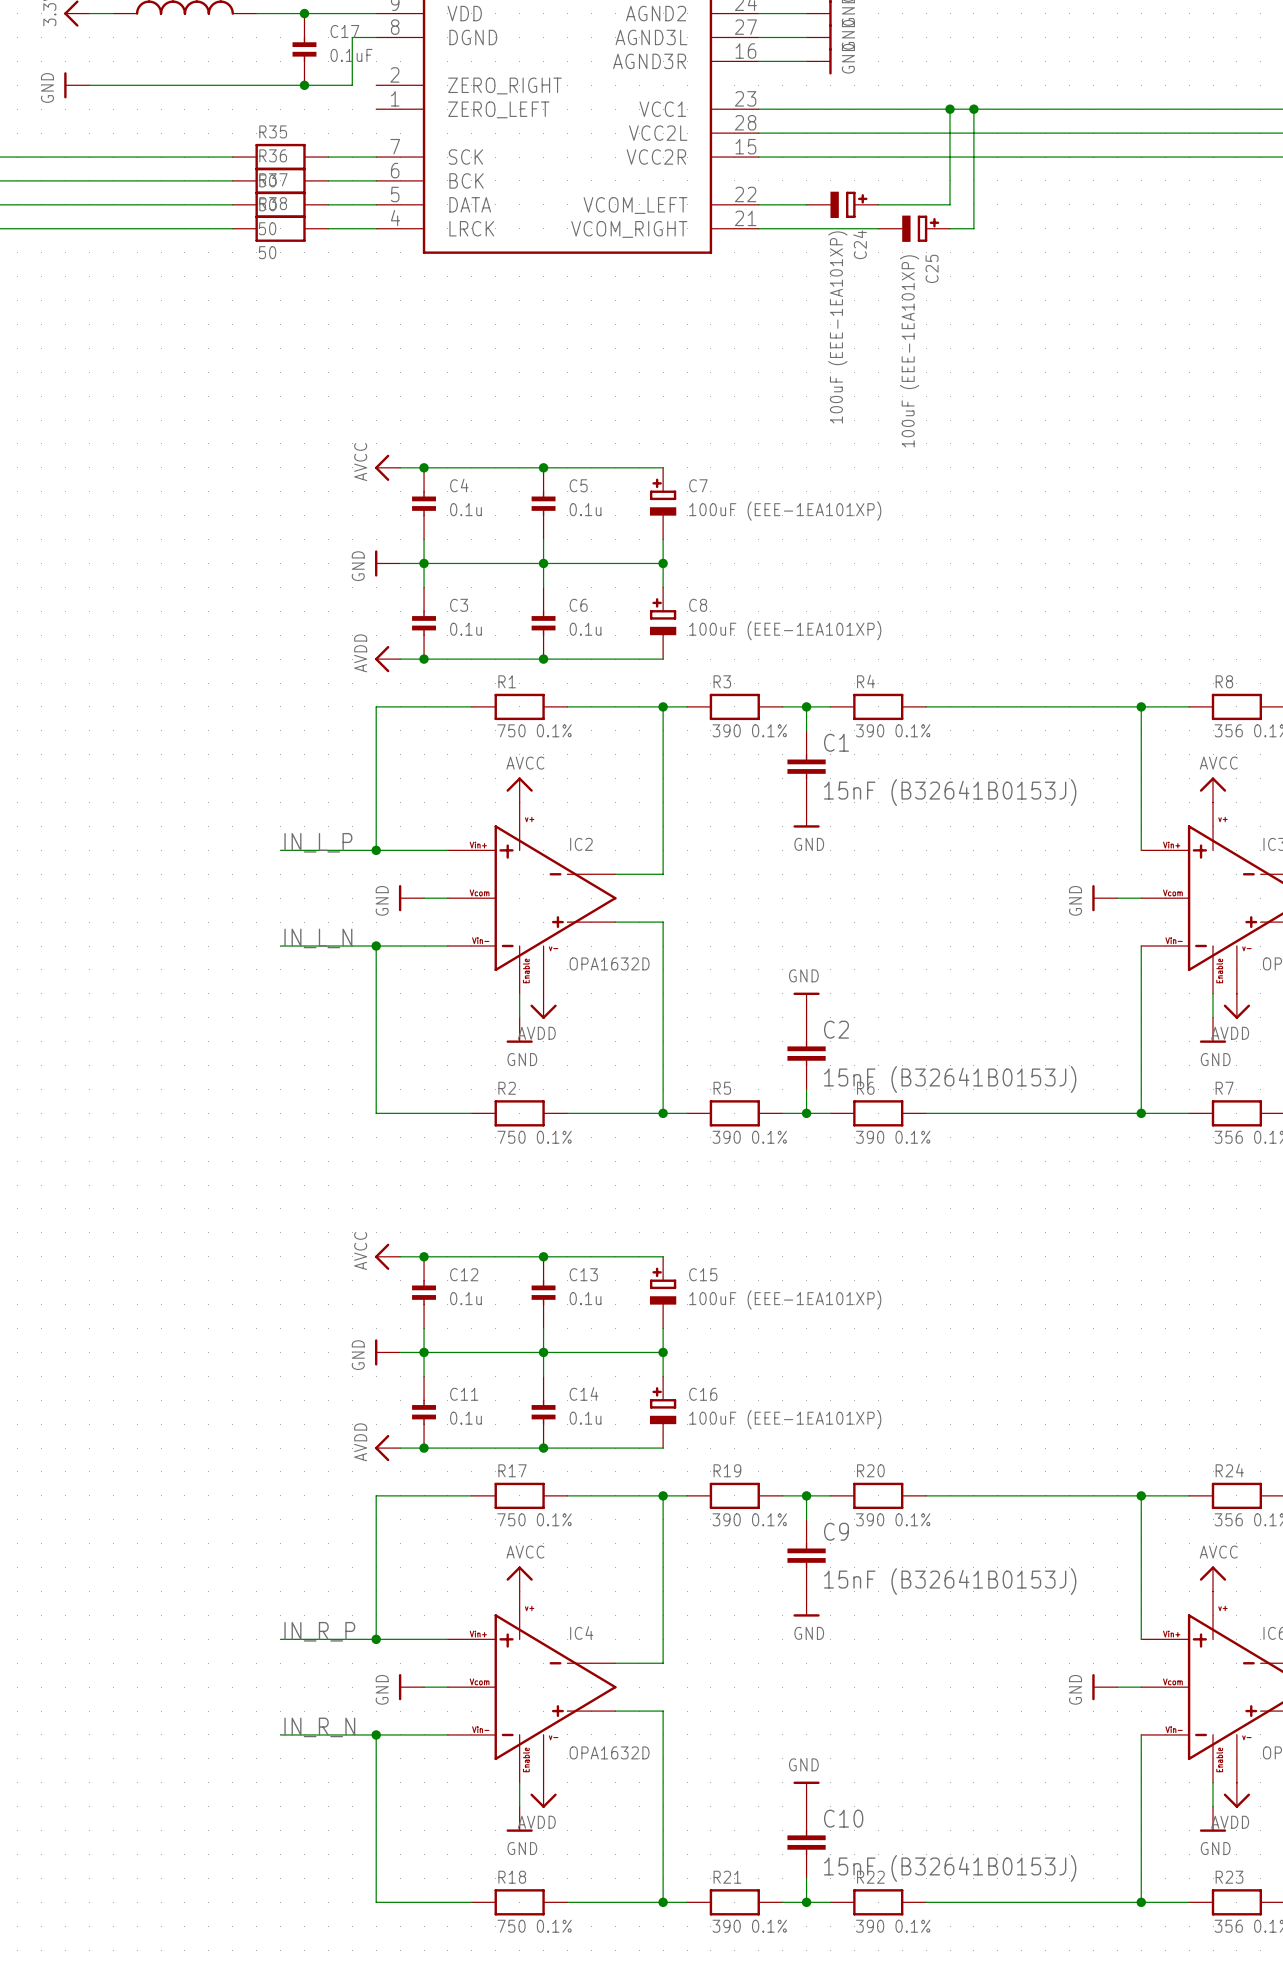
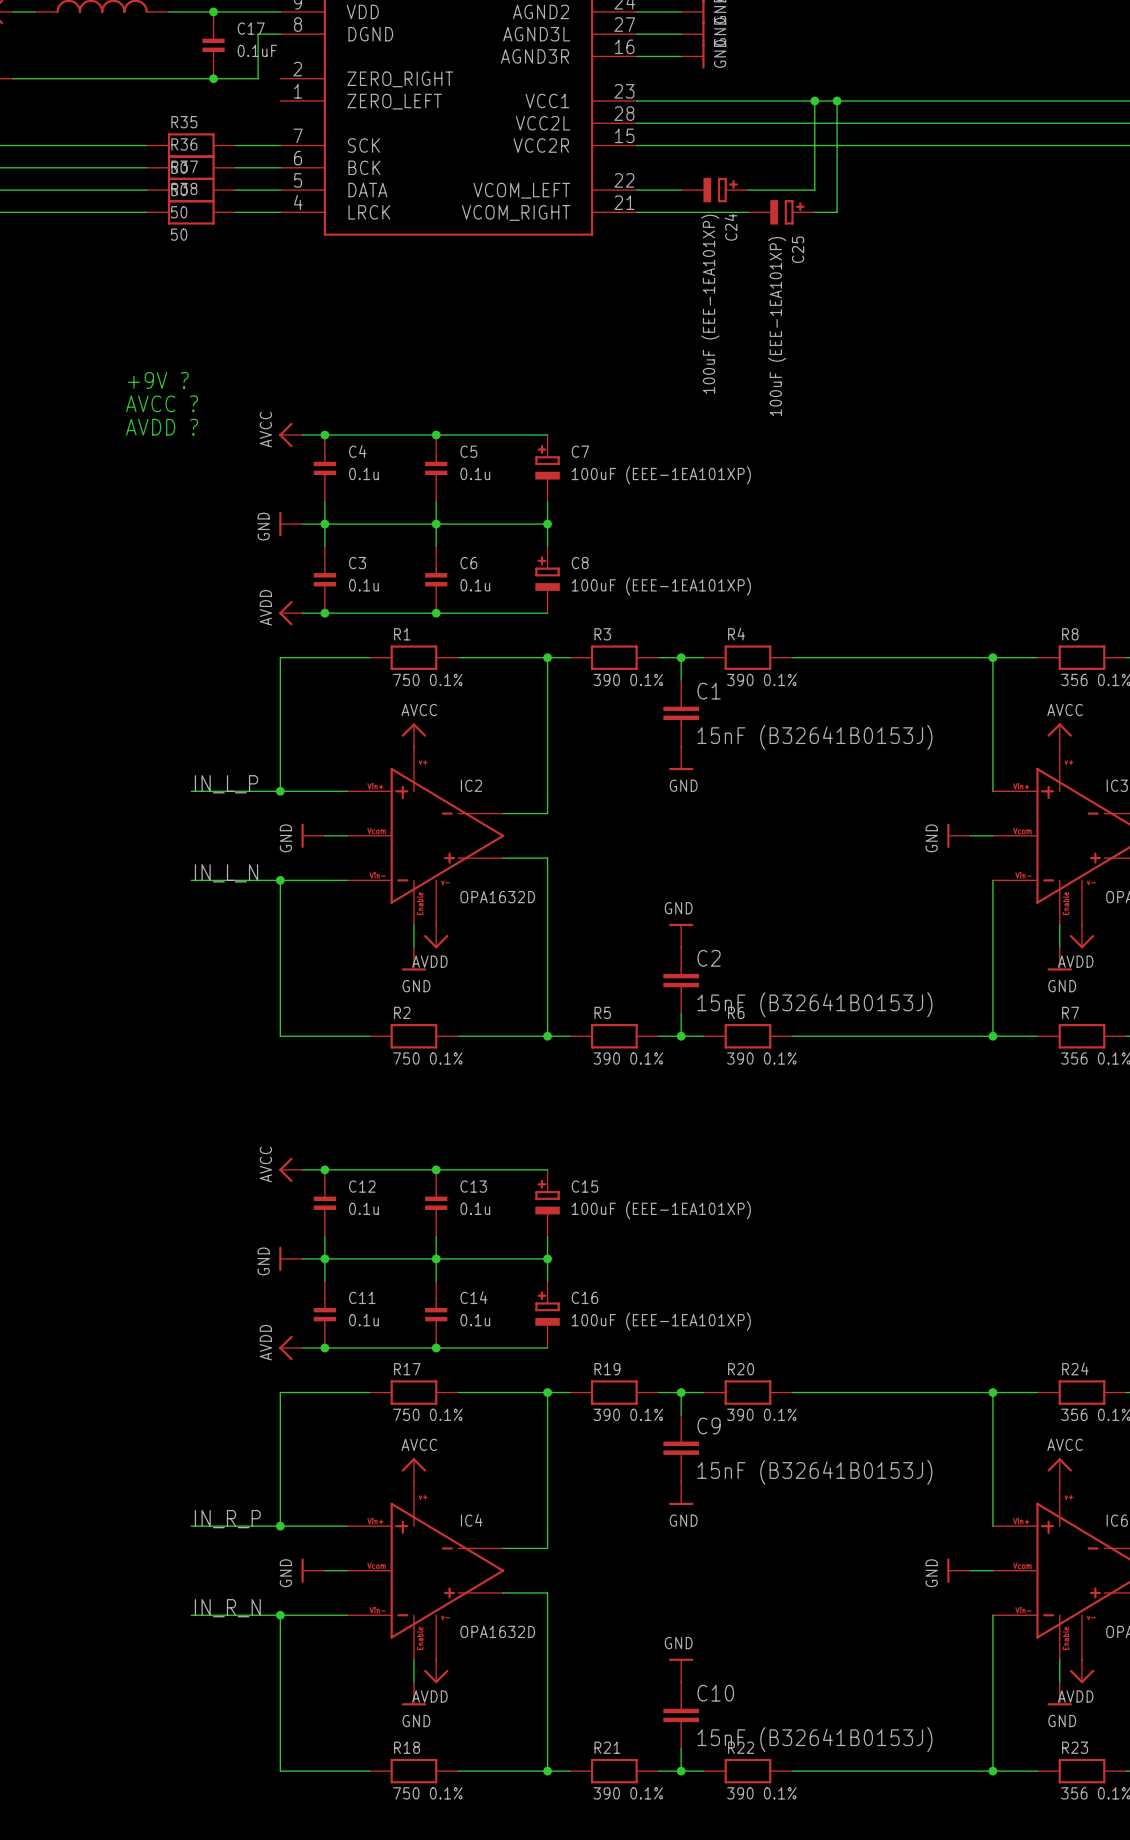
text: none -> +9V ? (158, 380)
text: none -> AVCC ? (162, 403)
text: none -> AVDD ? (162, 427)

